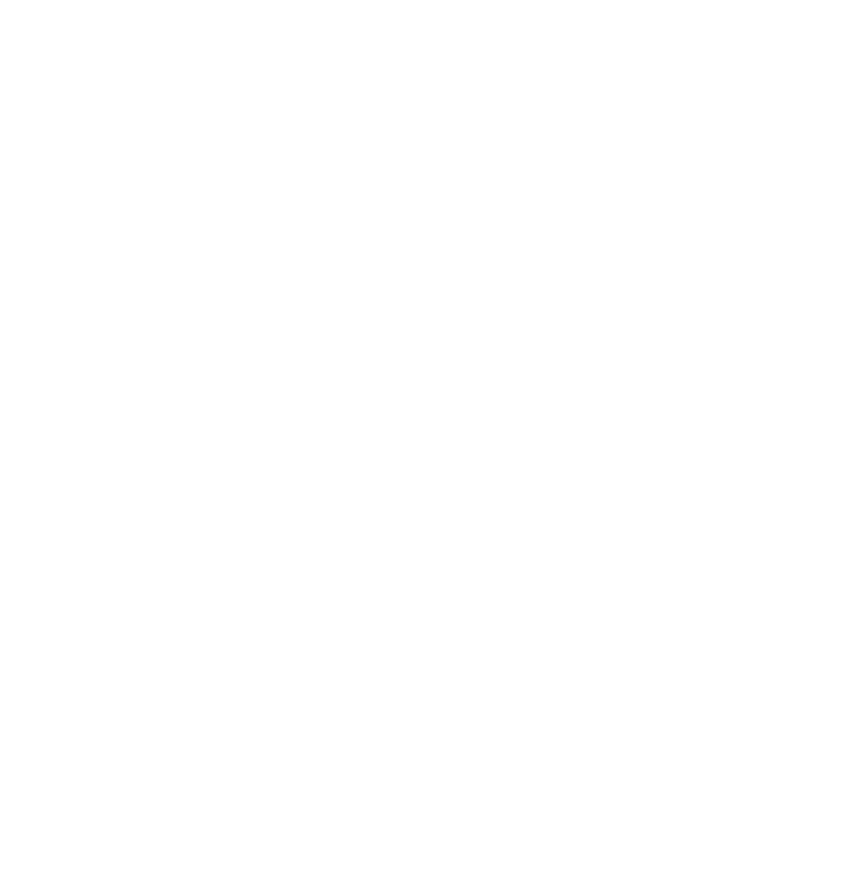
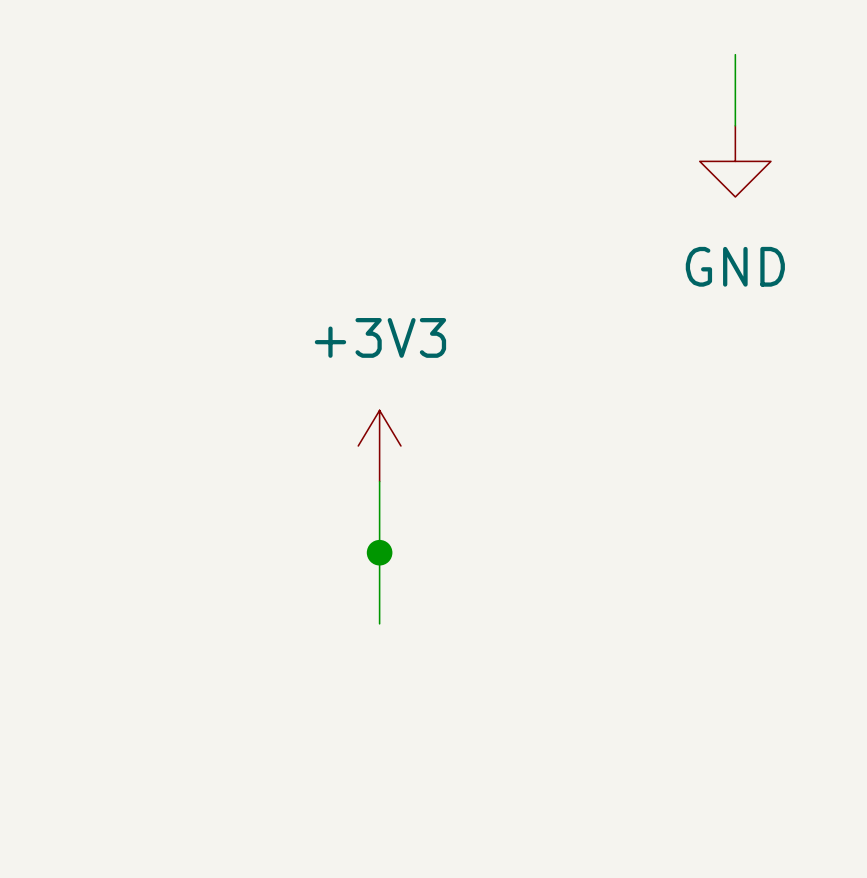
wire: none -> (735, 54) (735, 125)
power symbol: none -> GND (735, 161)
power symbol: none -> +3V3 (379, 445)
wire: none -> (379, 481) (379, 623)
junction: none -> (379, 552)

